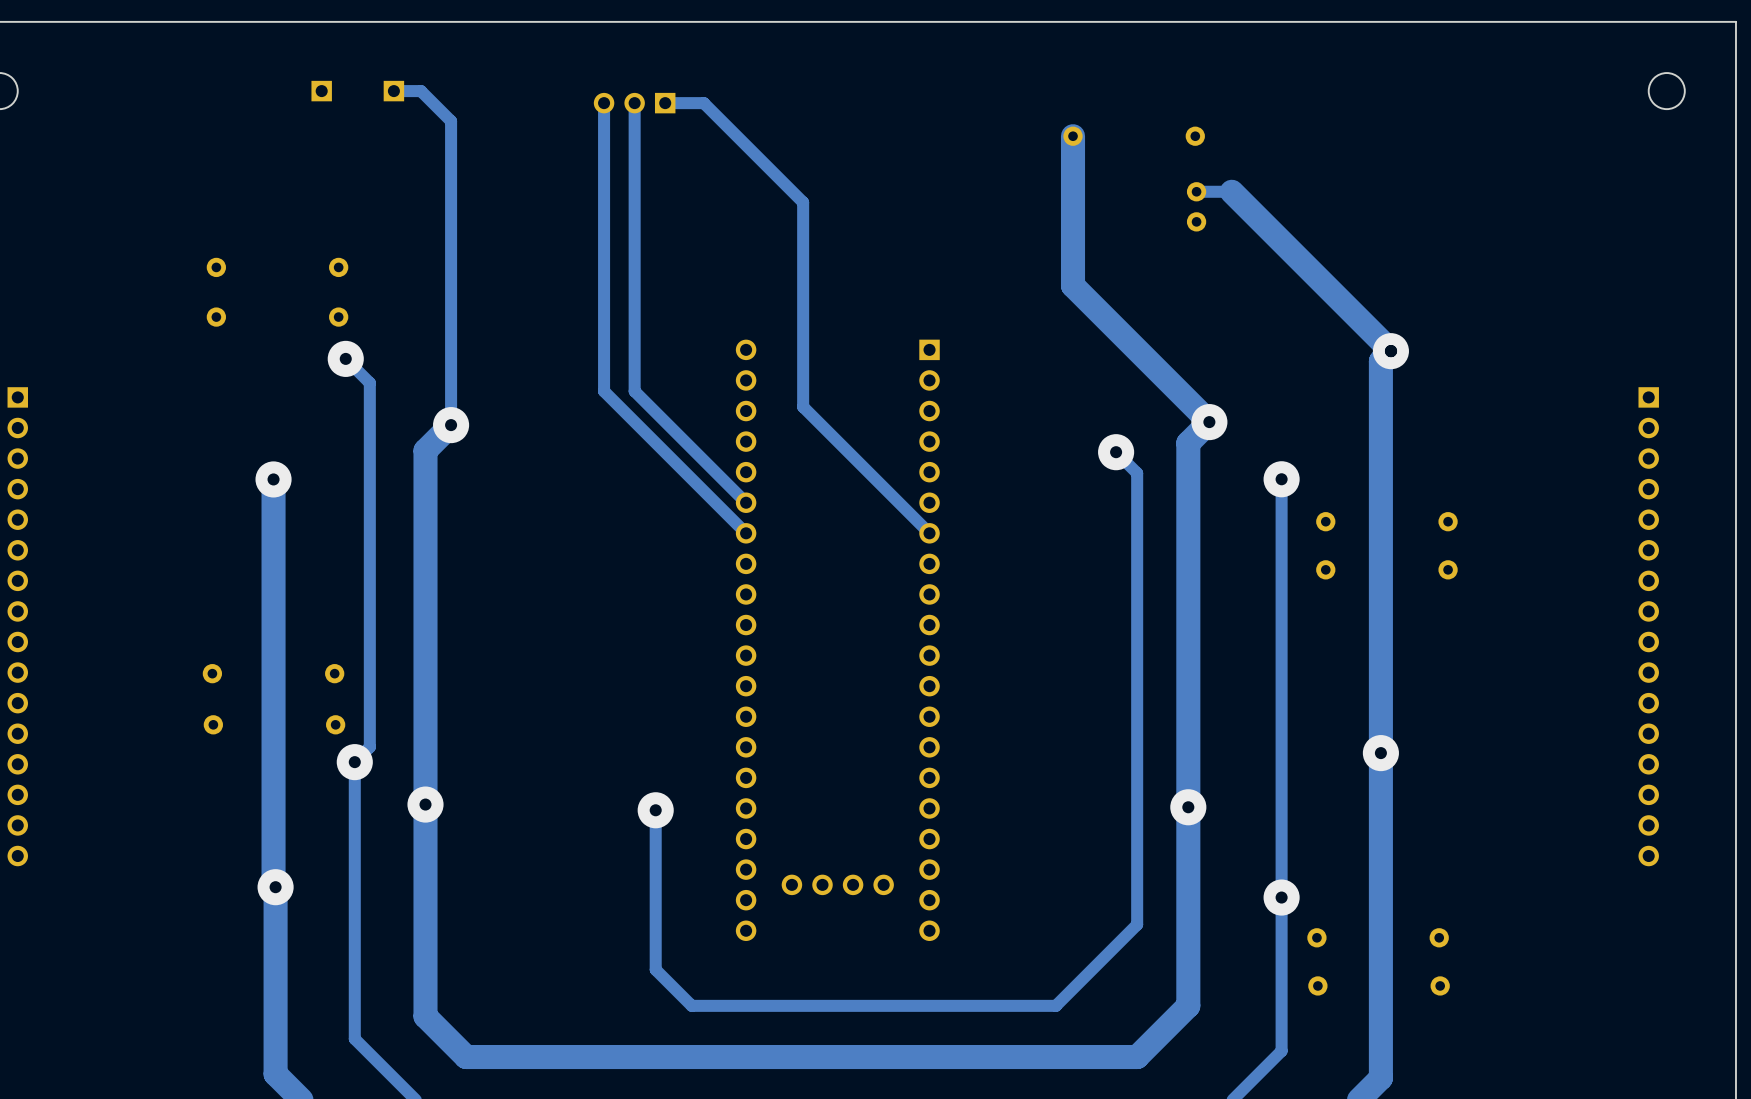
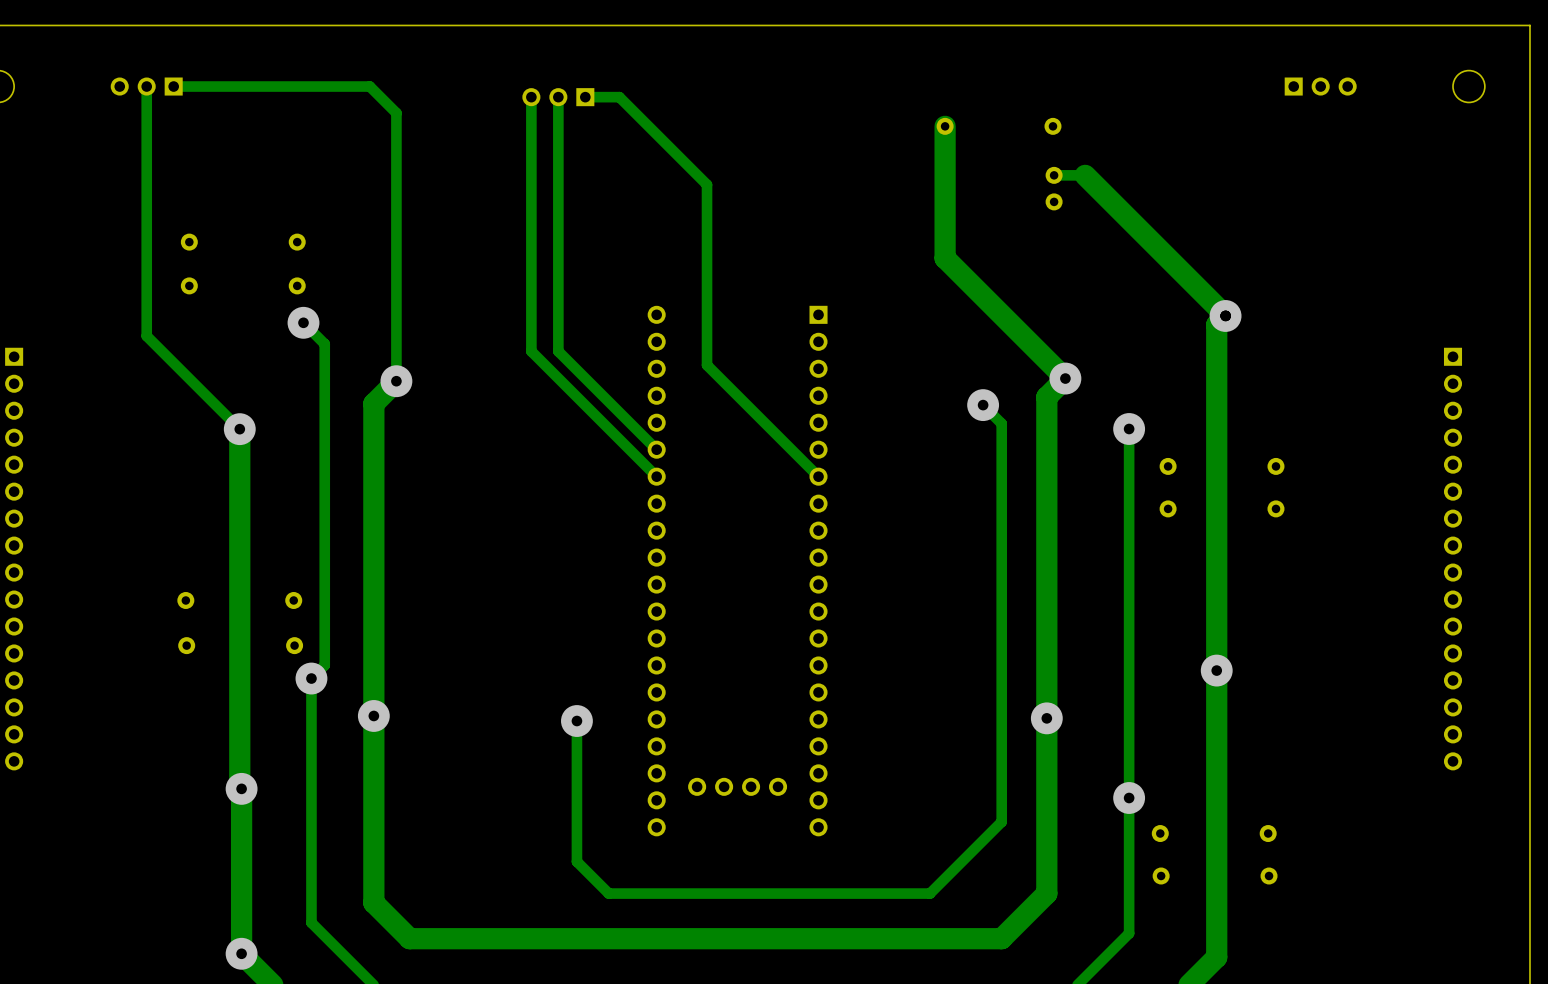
track: none -> (146, 86) (146, 336) (239, 429)
part: none -> (146, 86)
part: (321, 91) -> none
track: none -> (345, 86) (173, 86)
part: (393, 91) -> none
part: none -> (1320, 86)
via: none -> (241, 953)

